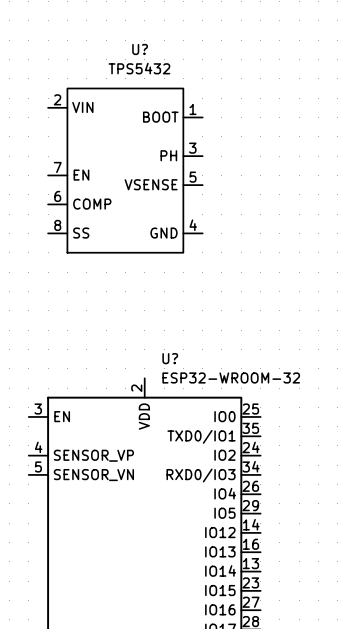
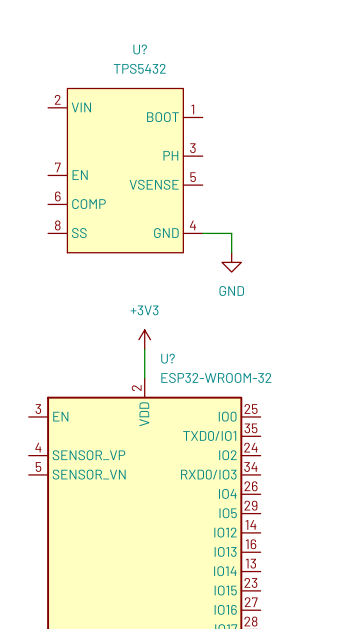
wire: none -> (202, 233) (231, 233) (231, 252)
power symbol: none -> GND (231, 262)
power symbol: none -> +3V3 (144, 339)
wire: none -> (144, 349) (144, 378)

